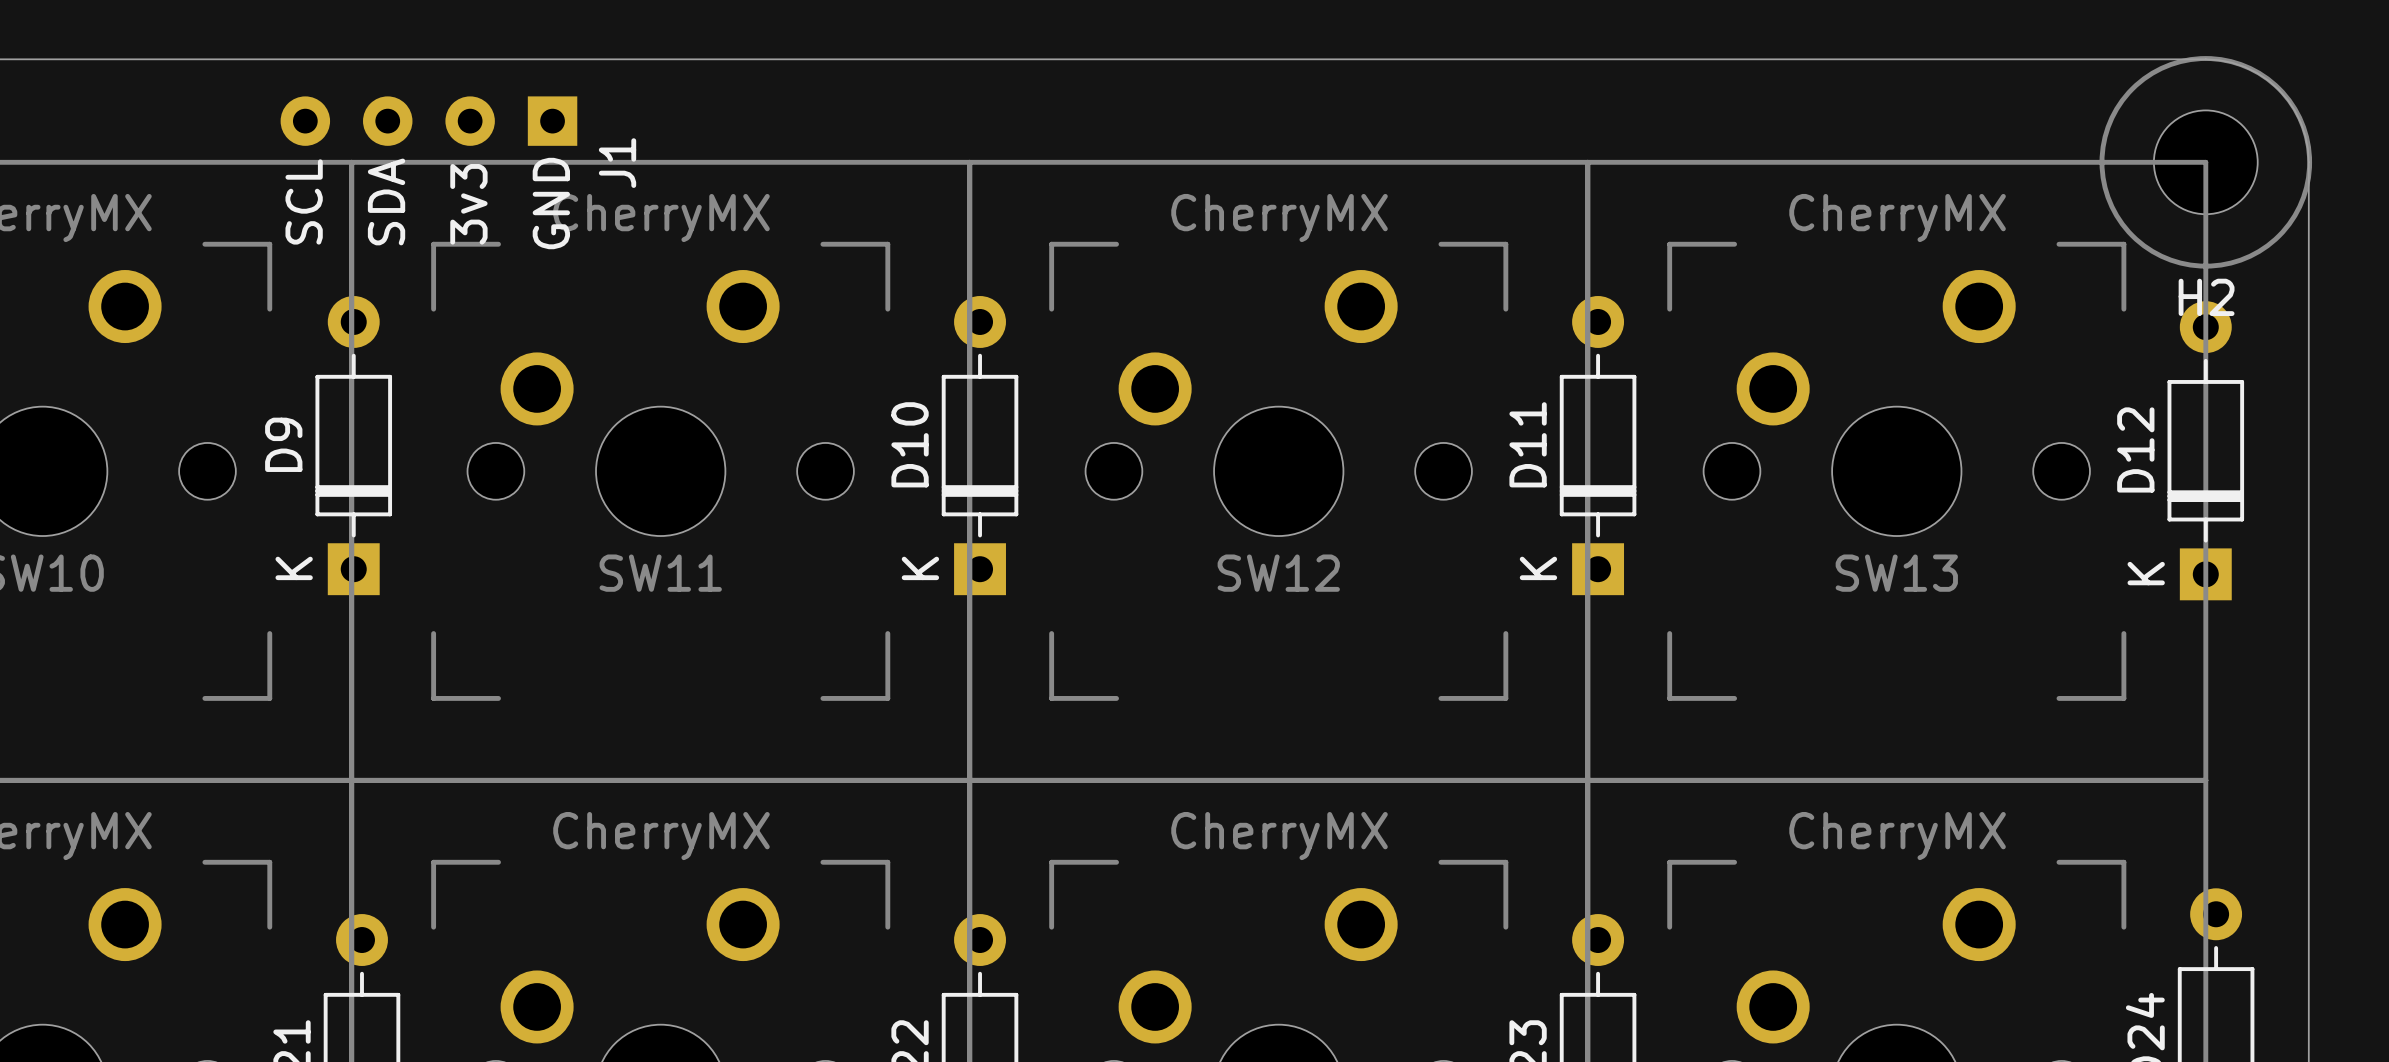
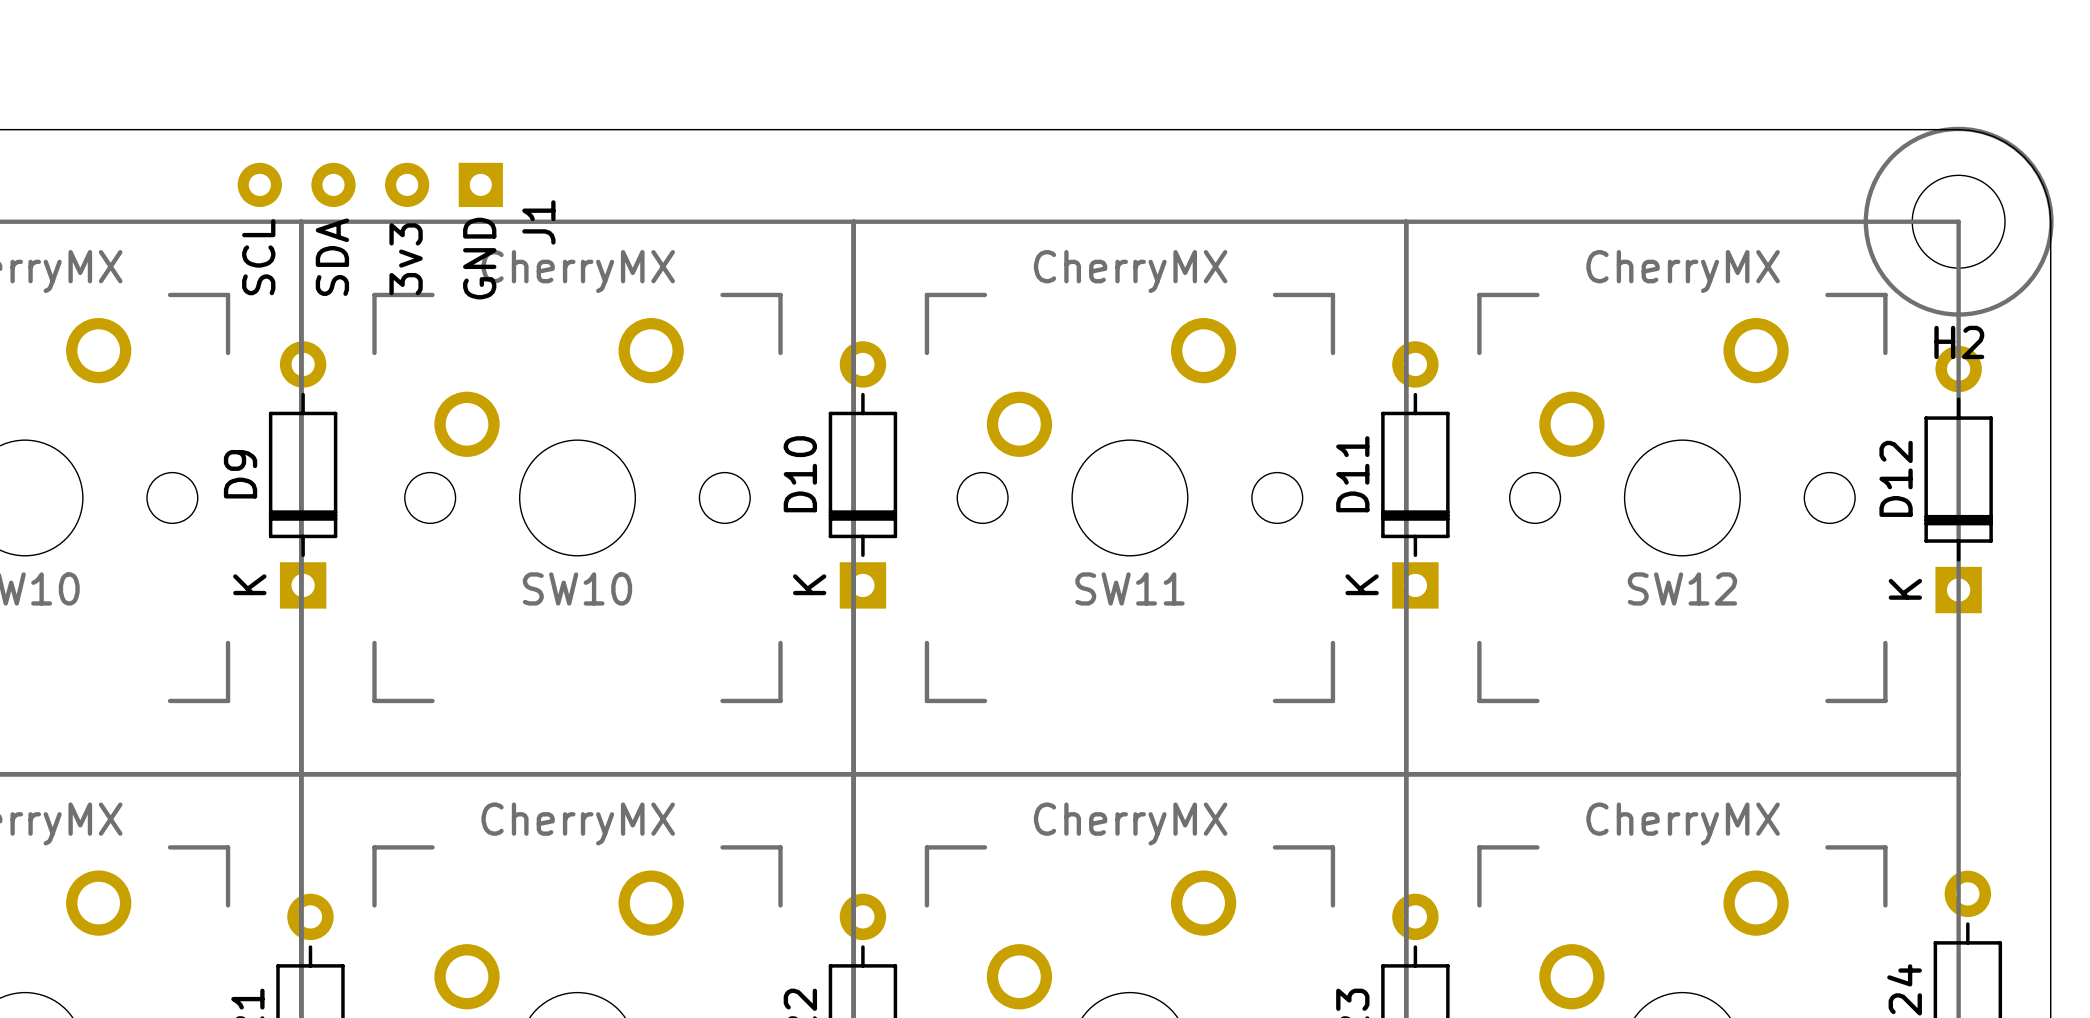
SW11 name: SW11 (660, 573) -> SW10 (577, 588)
SW12 name: SW12 (1278, 573) -> SW11 (1129, 588)
SW13 name: SW13 (1896, 573) -> SW12 (1682, 588)

